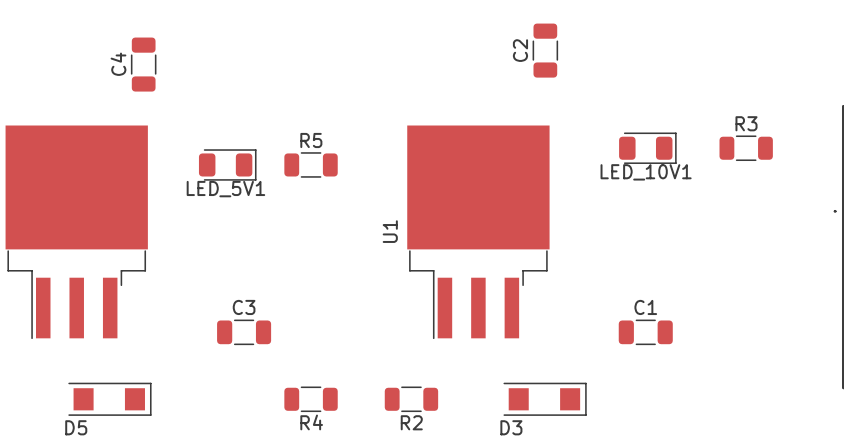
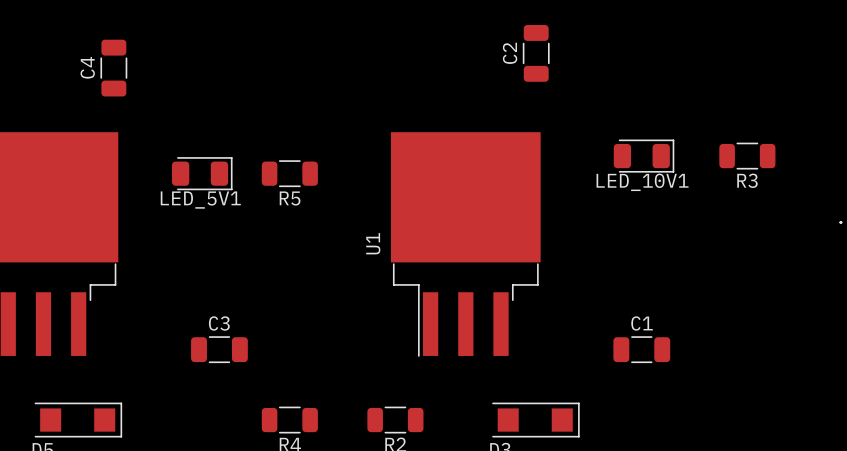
R3 name position: R3 (746, 123) -> R3 (747, 180)
R5 name position: R5 (311, 140) -> R5 (290, 198)

